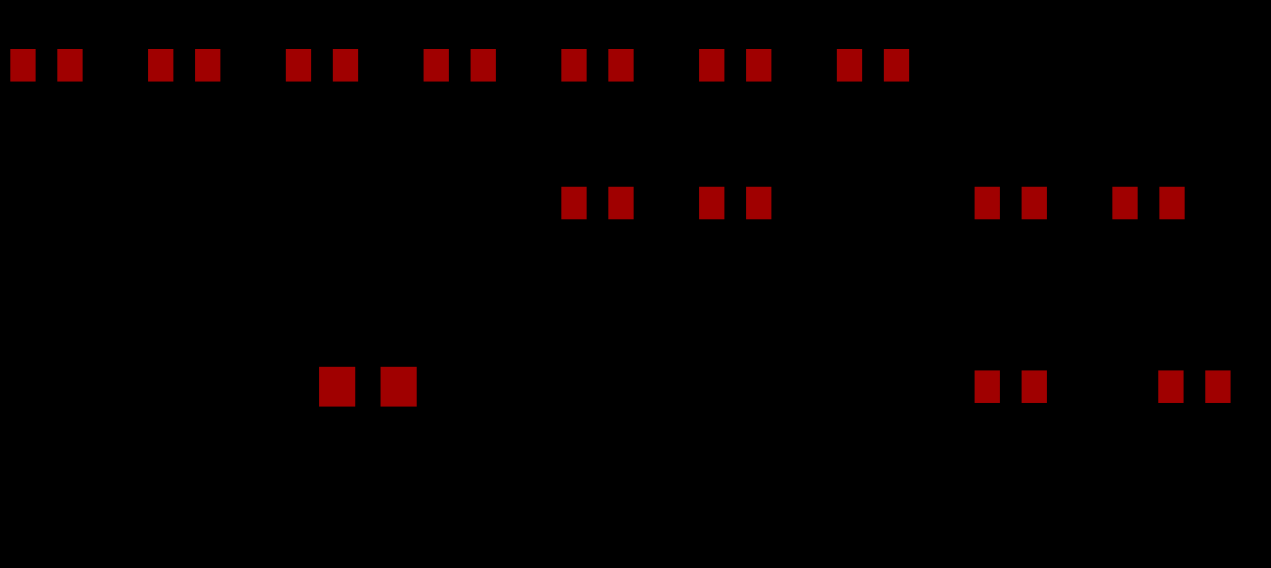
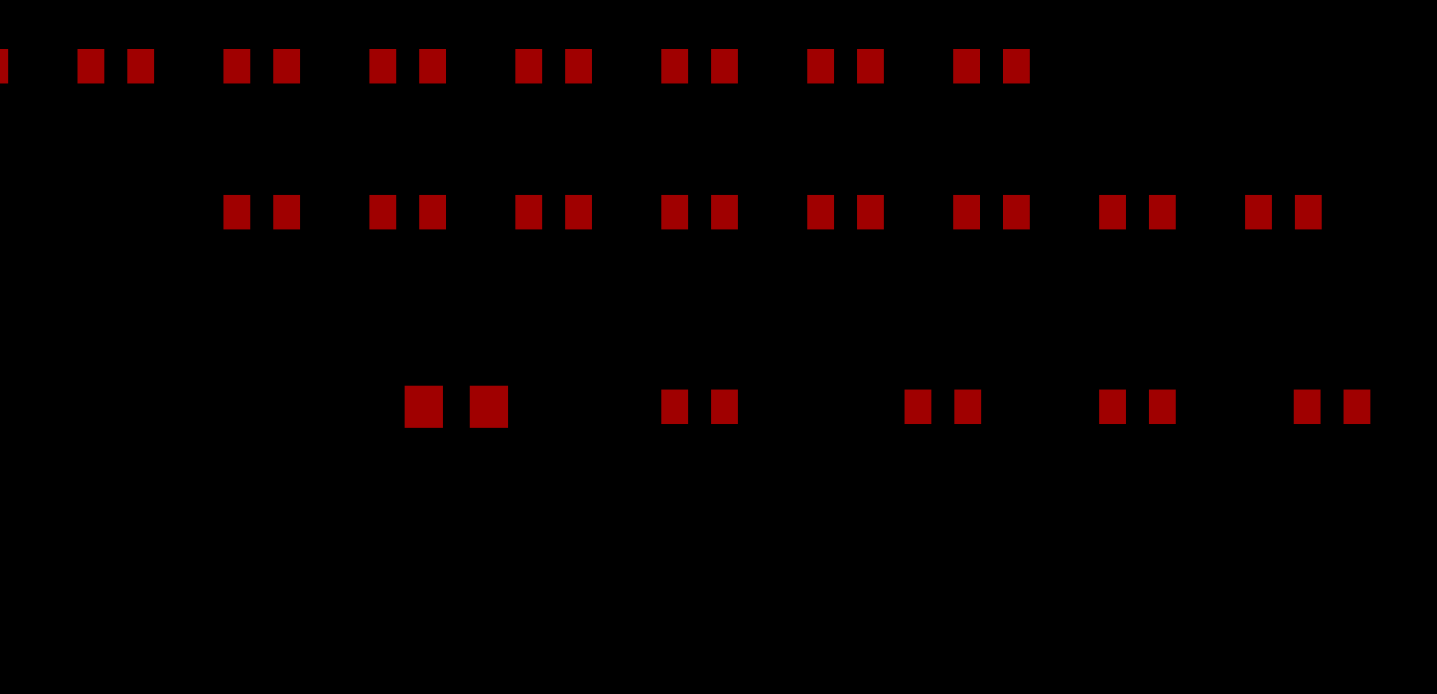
part: none -> (261, 212)
part: none -> (407, 212)
part: none -> (553, 212)
part: none -> (991, 212)
part: none -> (699, 406)
part: none -> (942, 406)

